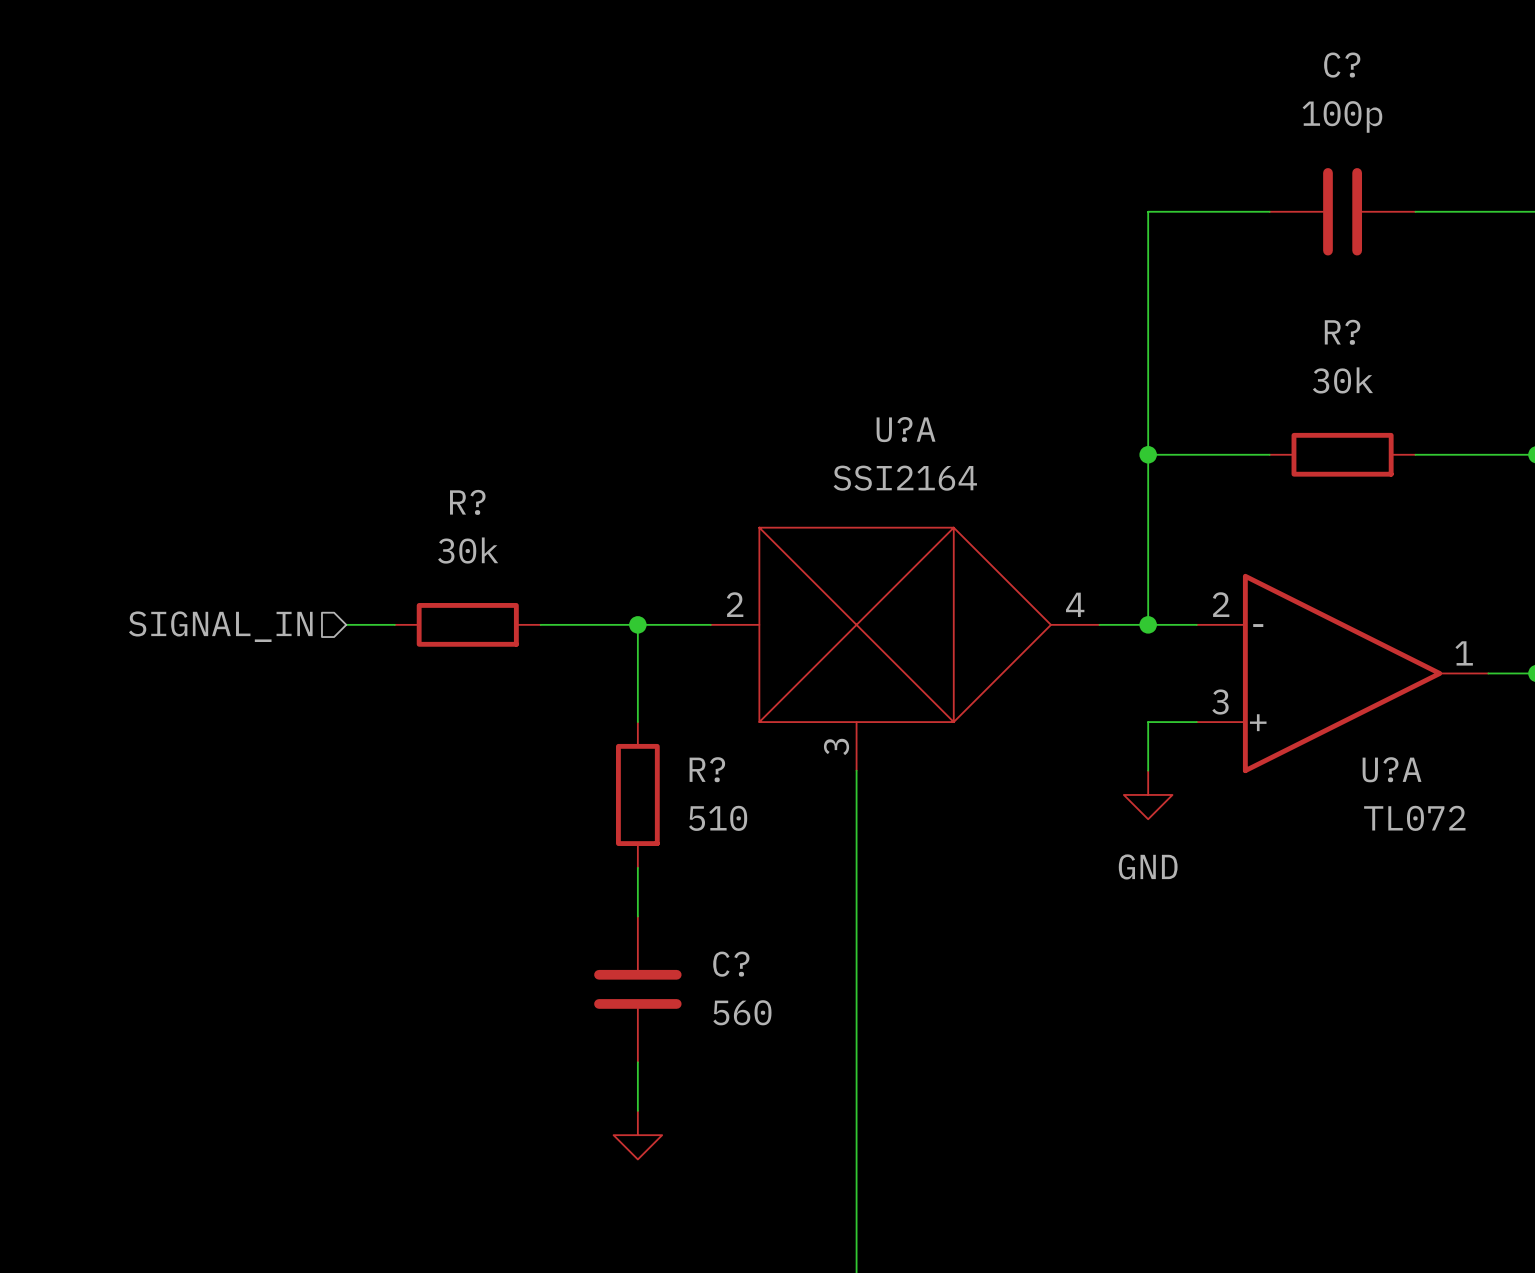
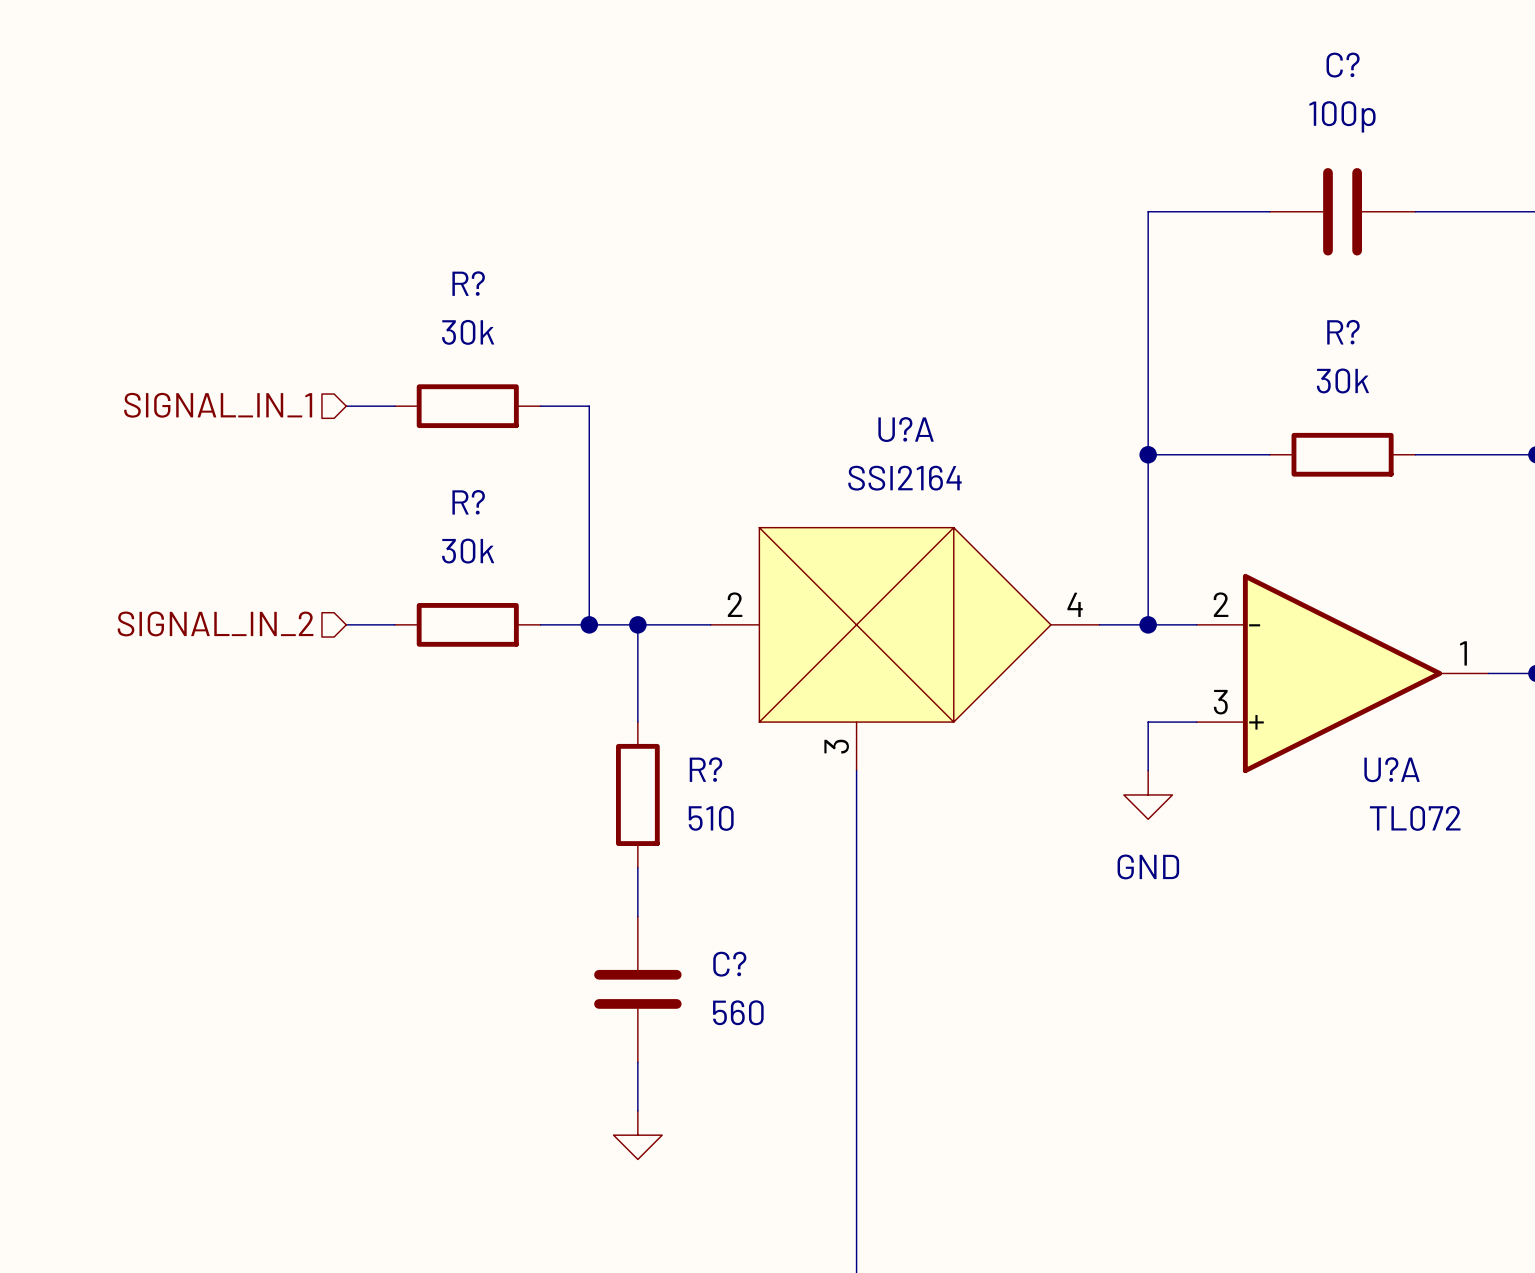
wire: none -> (346, 406) (394, 406)
R?: none -> 30k (467, 406)
wire: none -> (540, 406) (589, 406) (589, 624)
hierarchical label: none -> SIGNAL_IN_1 (218, 405)
junction: none -> (589, 624)
hierarchical label: SIGNAL_IN (220, 626) -> SIGNAL_IN_2 (215, 623)

